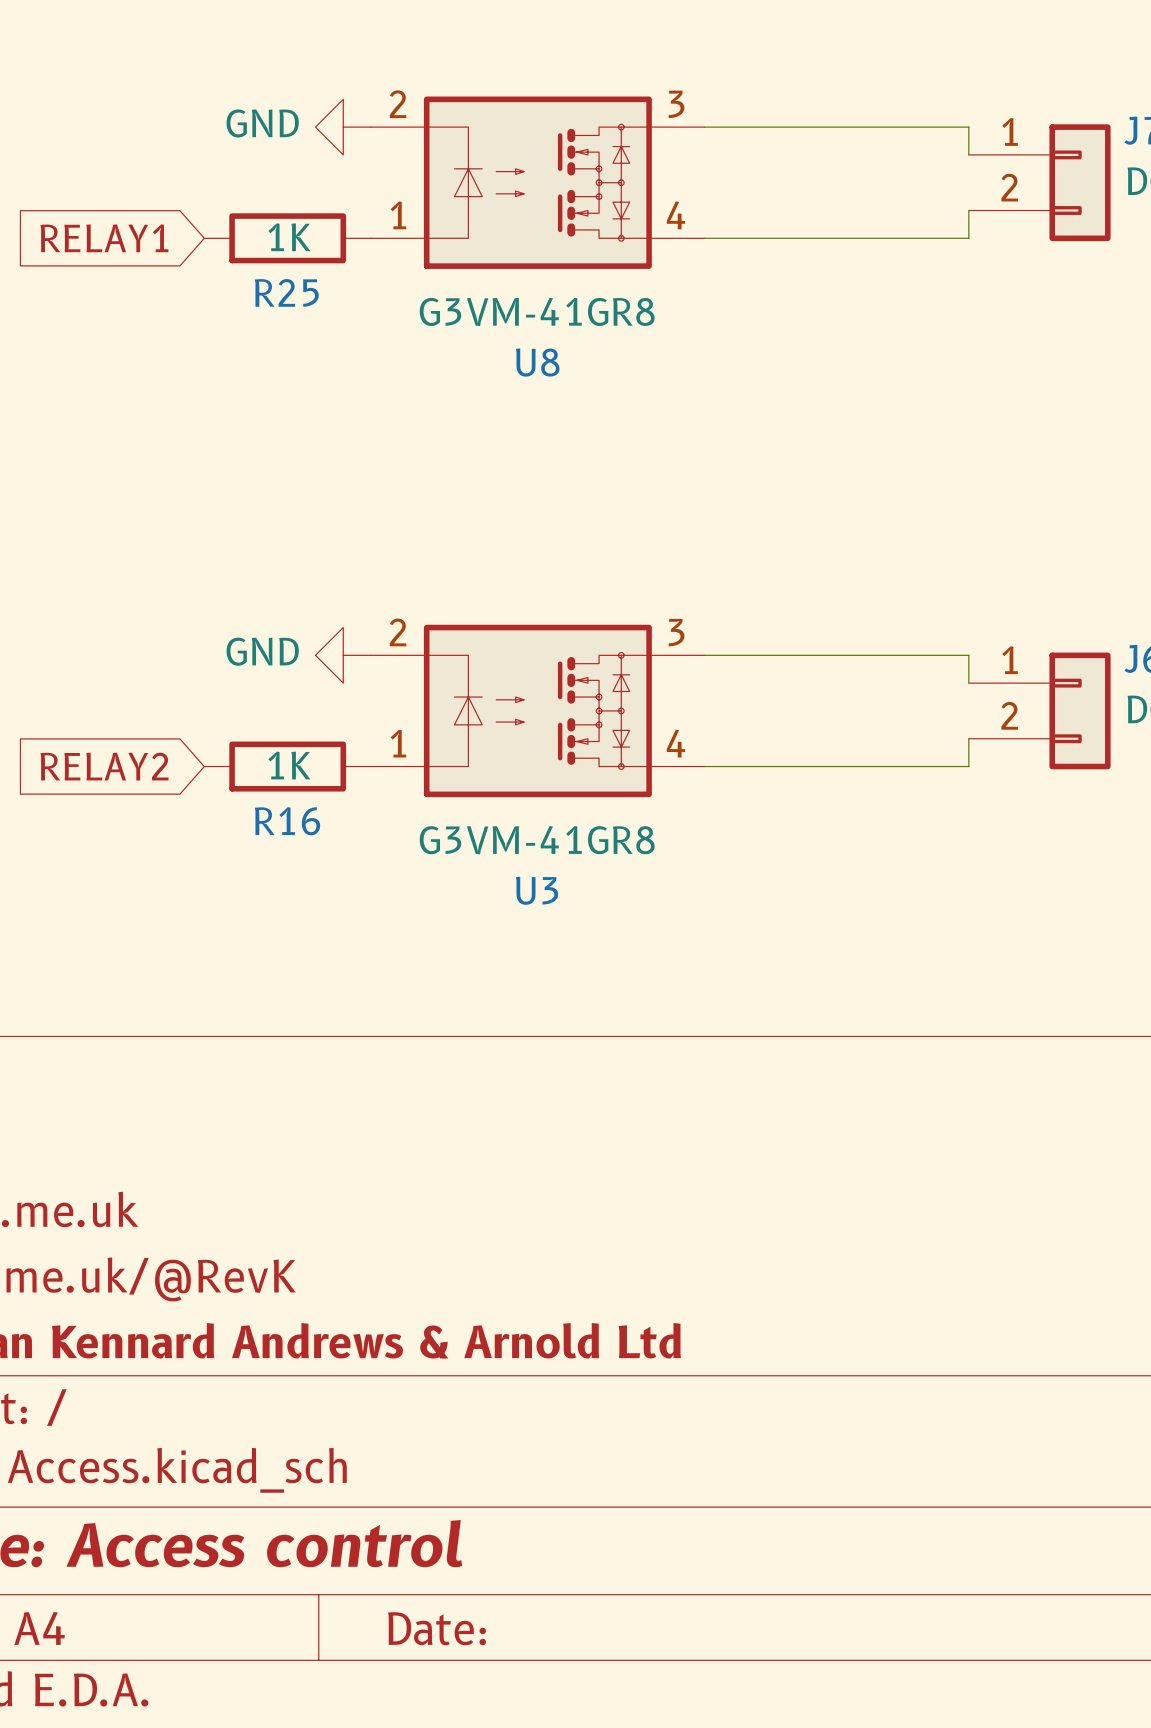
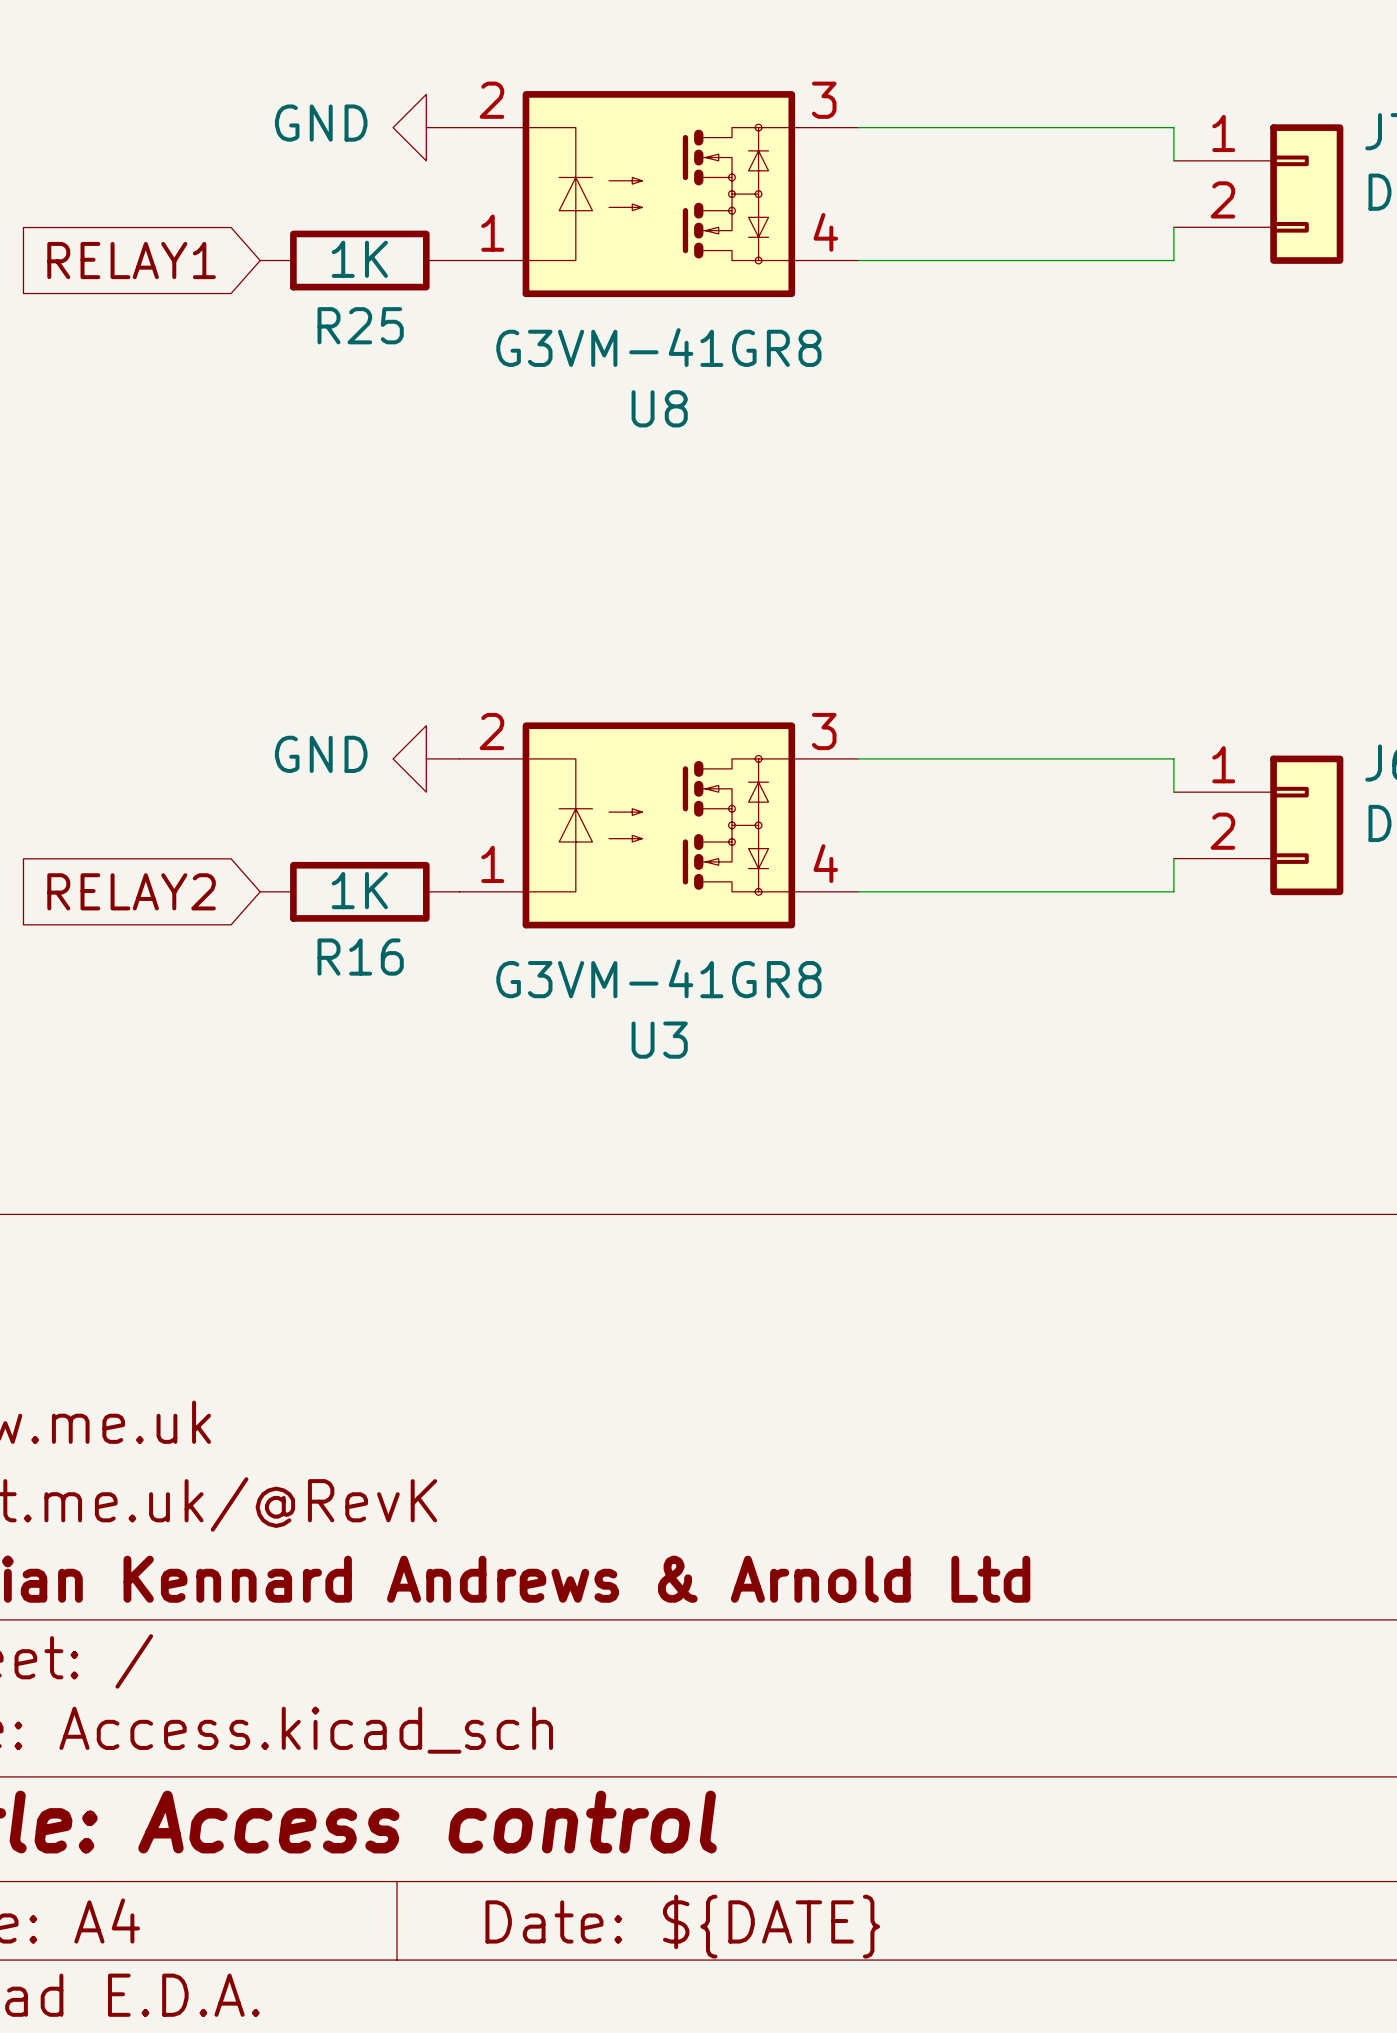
title block: Date: (437, 1628) -> Date: ${DATE} (682, 1926)

